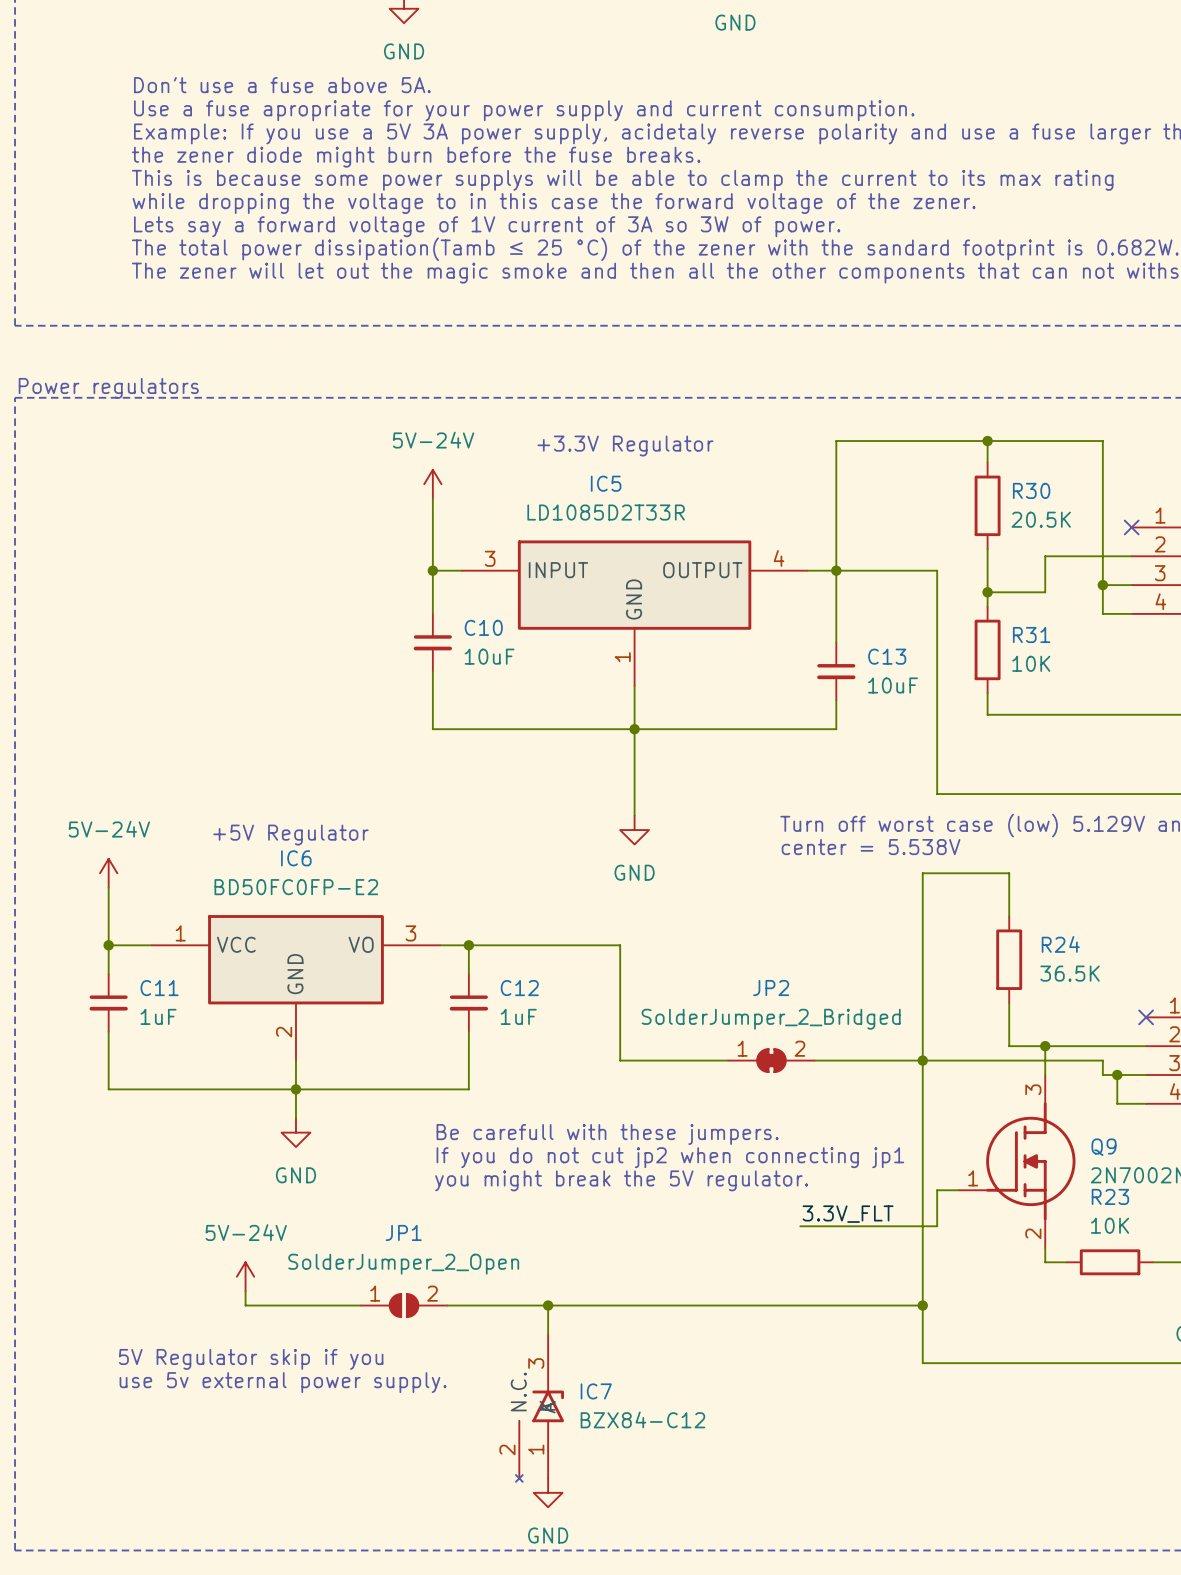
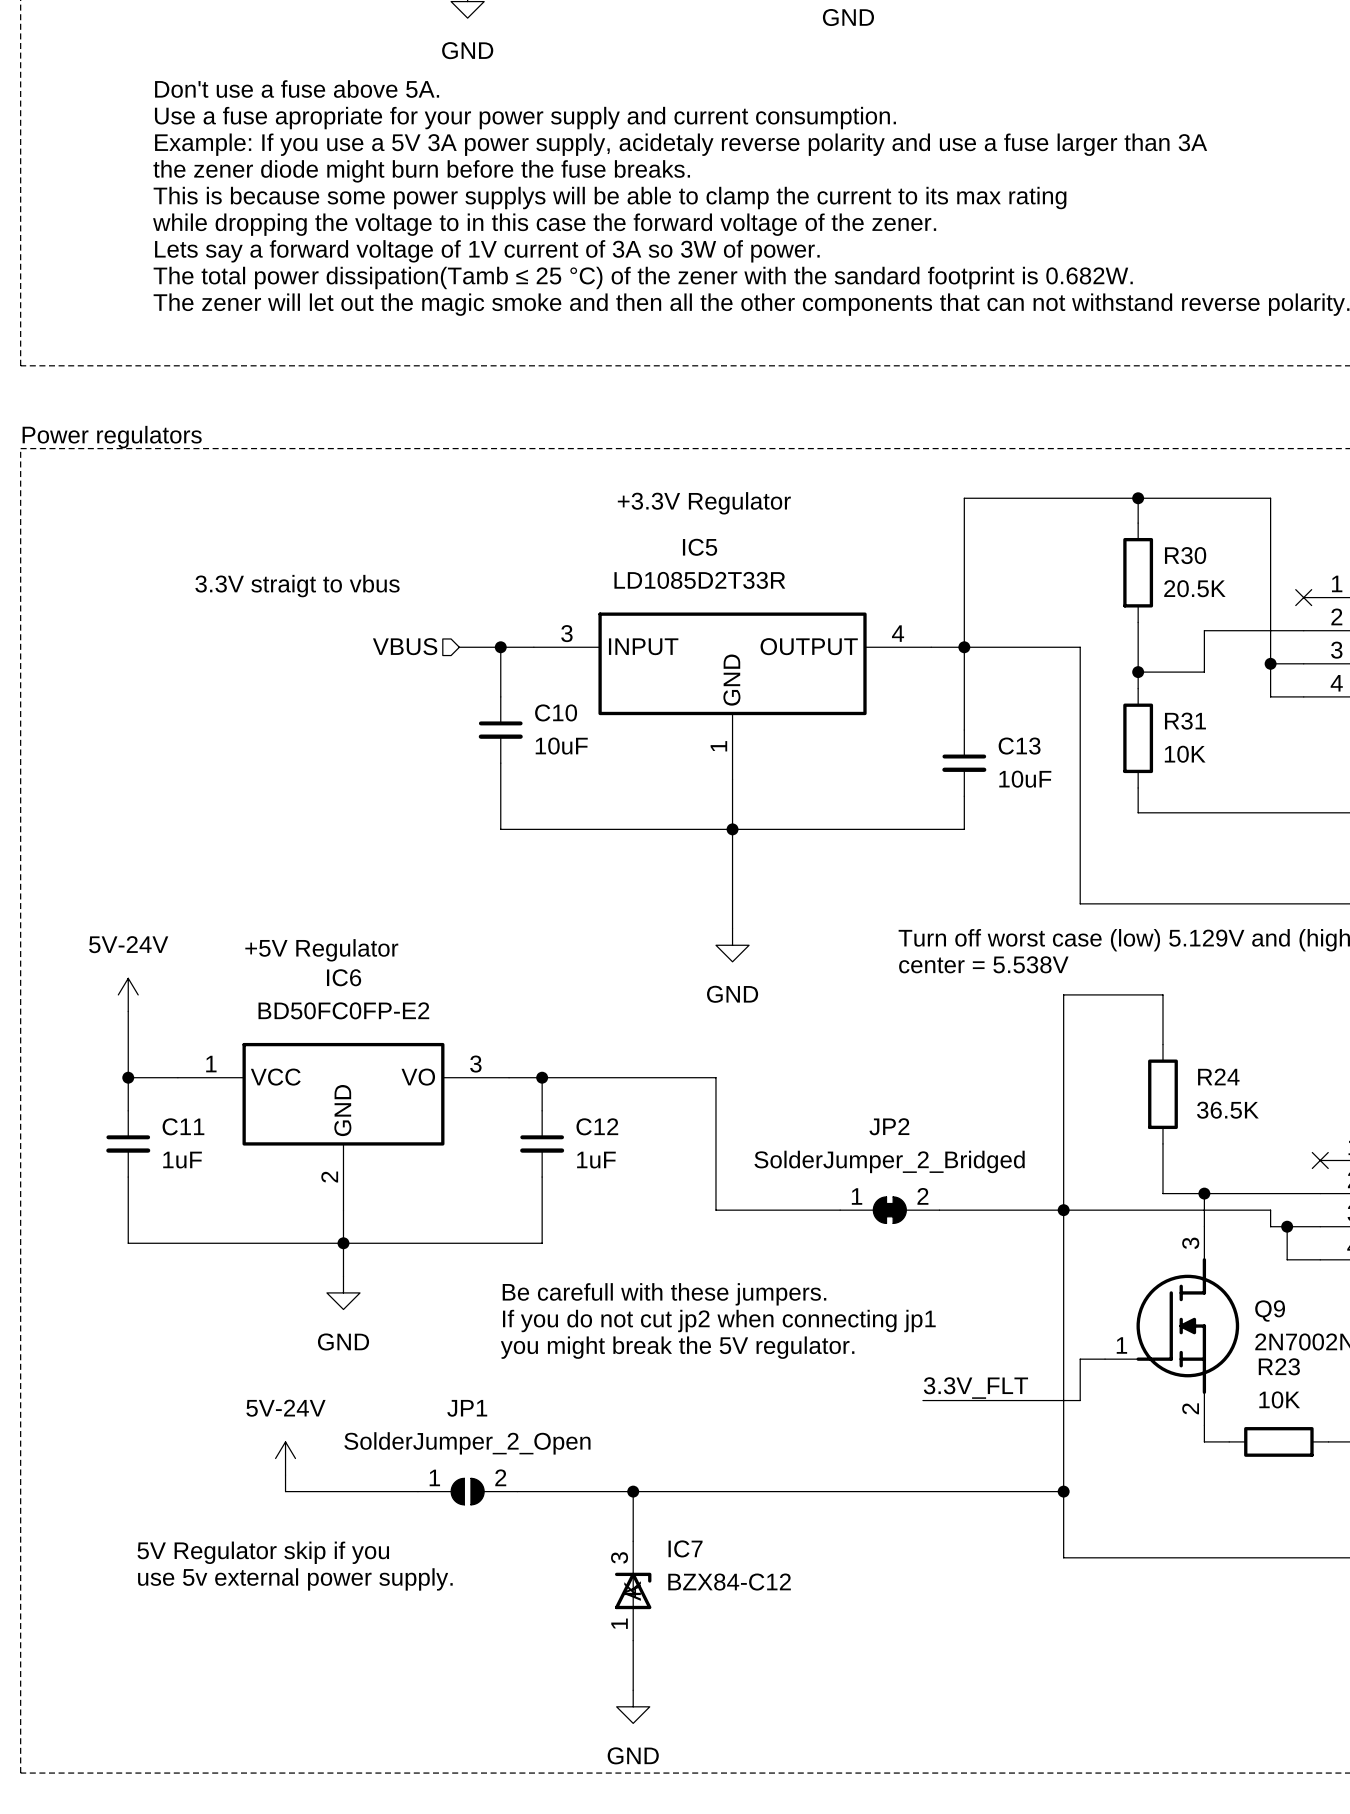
power symbol: 5V-24V (432, 484) -> none
wire: (432, 498) (432, 570) -> (459, 647) (500, 647)
text: none -> 3.3V straigt to vbus (297, 586)
hierarchical label: none -> VBUS (405, 646)
IC7 symbol: [515, 1334, 564, 1482] -> [614, 1541, 652, 1641]

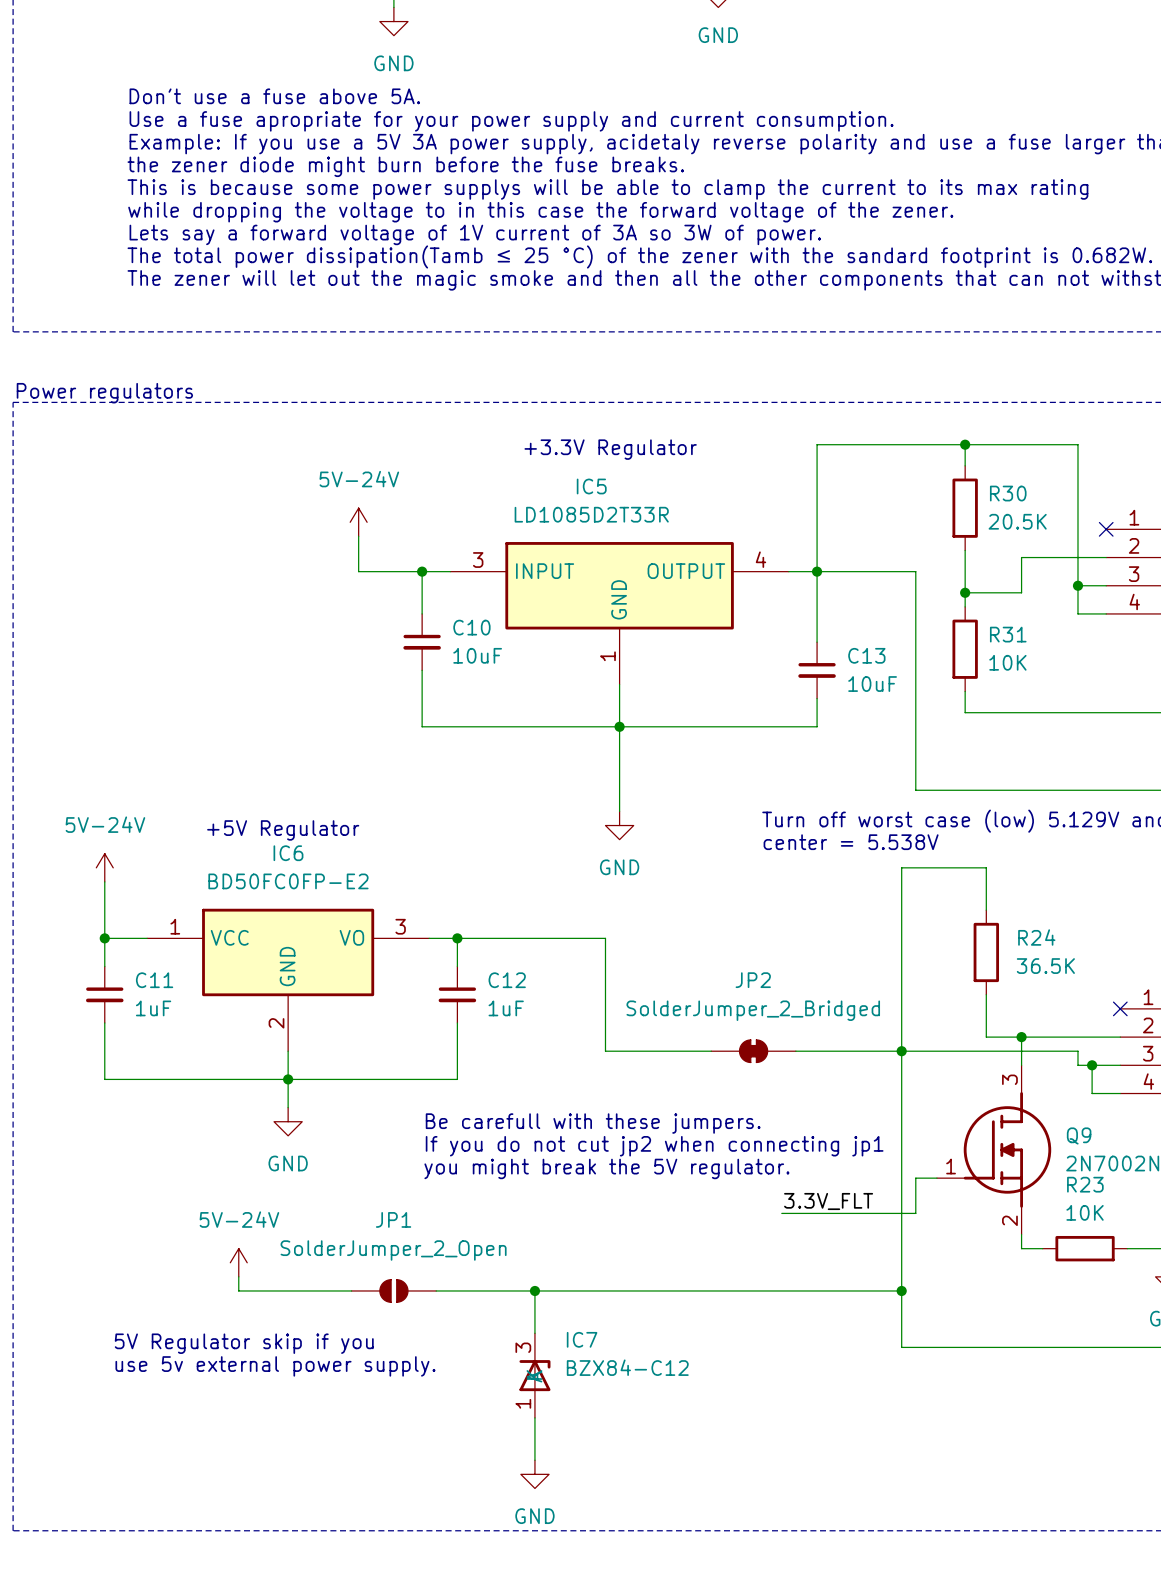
text: 3.3V straigt to vbus (297, 586) -> none
power symbol: none -> 5V-24V (358, 522)
wire: none -> (358, 536) (358, 571) (386, 571)
hierarchical label: VBUS (405, 646) -> none
JP2 pin number: 1 (857, 1196) -> none
JP2 pin number: 2 (922, 1196) -> none
JP1 pin number: 1 (434, 1477) -> none
JP1 pin number: 2 (500, 1477) -> none

